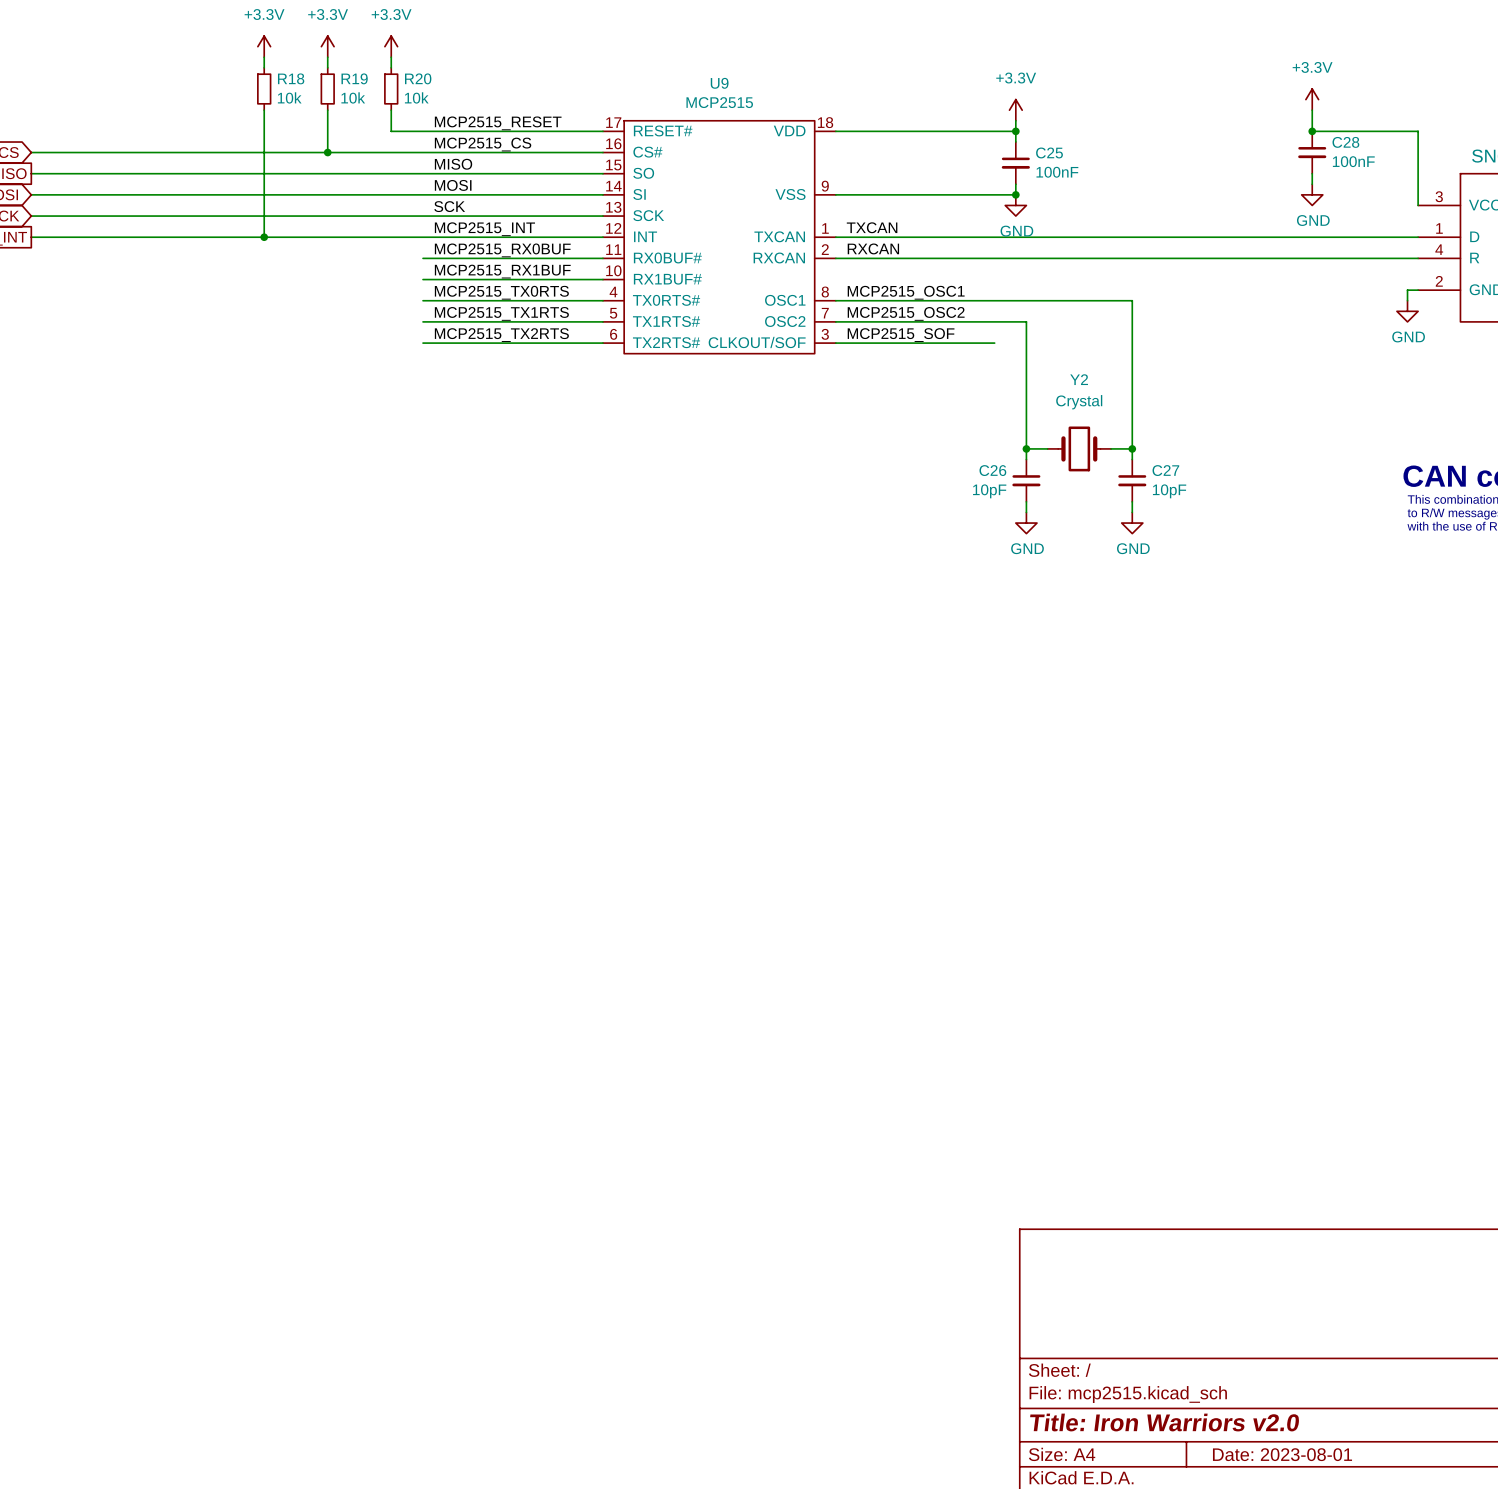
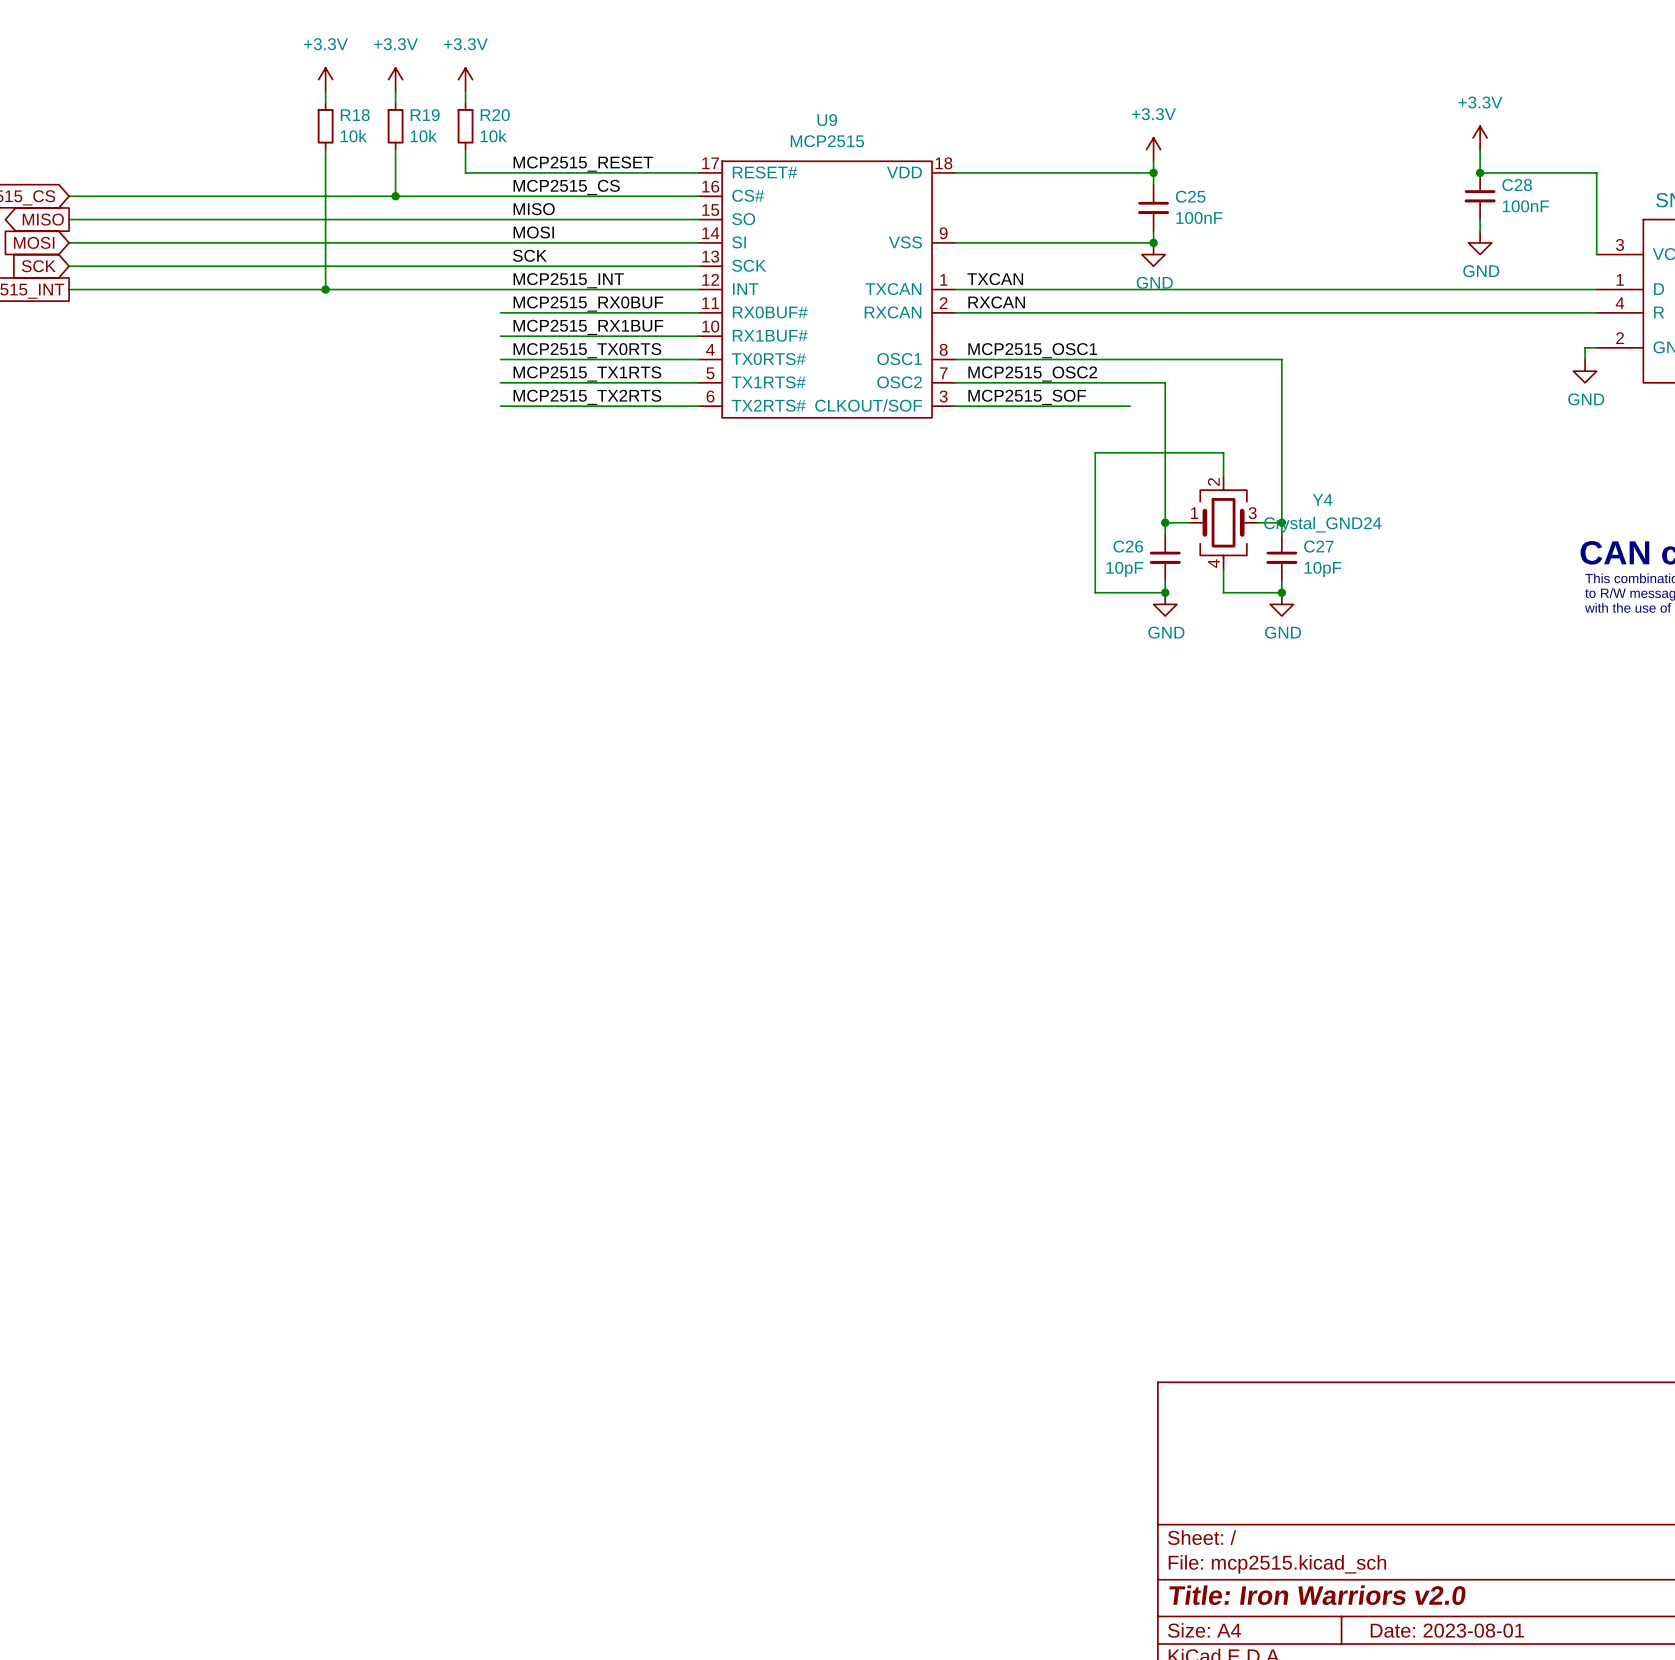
wire: none -> (1223, 476) (1223, 452) (1095, 452) (1095, 592) (1165, 592)
Y2: Crystal (1079, 448) -> none
Y4: none -> Crystal_GND24 (1223, 522)
wire: none -> (1223, 569) (1223, 592) (1281, 592)
junction: none -> (1165, 592)
junction: none -> (1281, 592)

